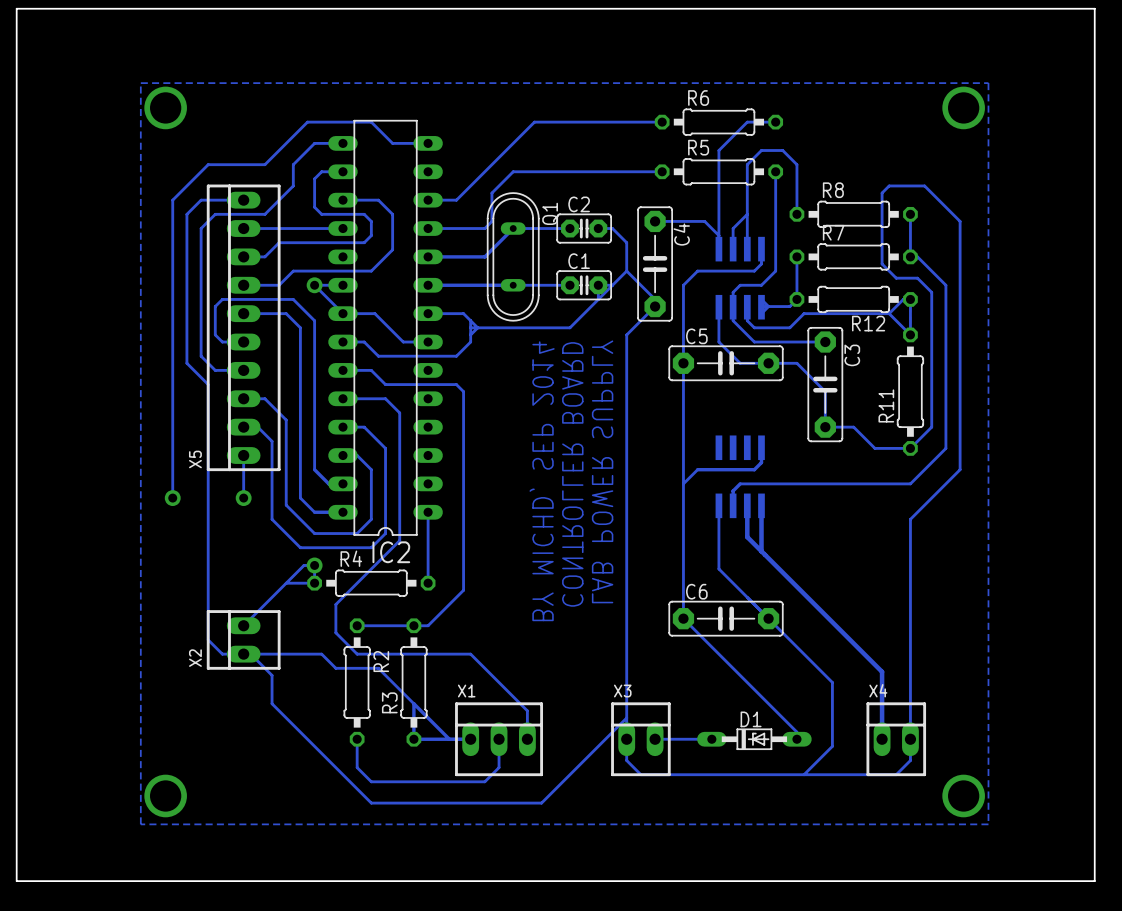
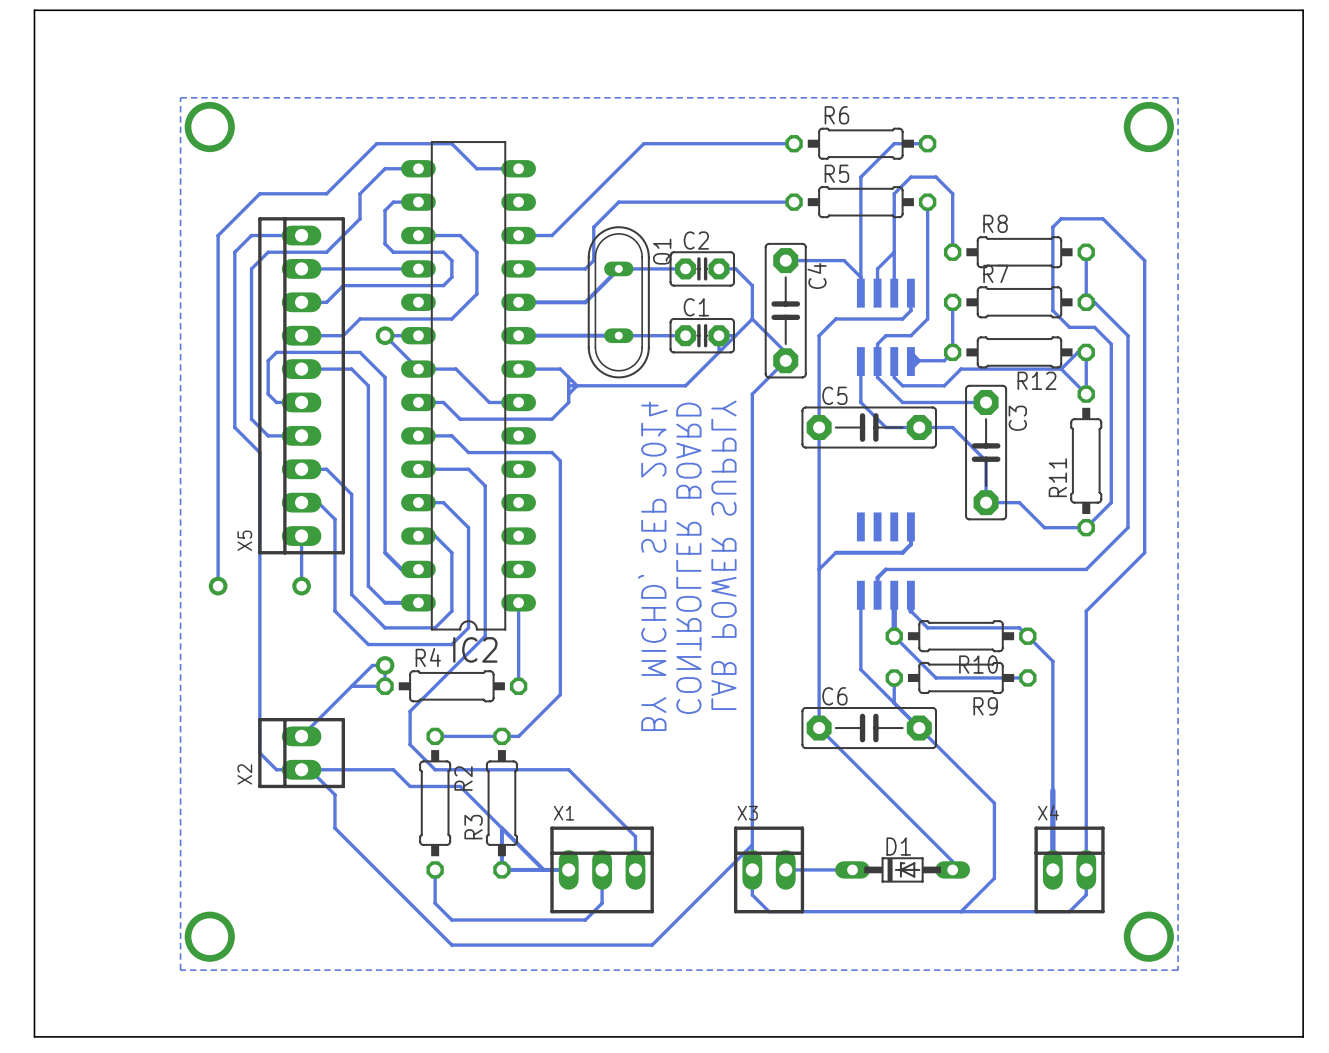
bottom track: (761, 519) (761, 551) -> none
bottom track: (747, 537) (882, 671) -> (910, 611) (927, 627) (1019, 627) (1052, 661) (1052, 790)
bottom track: none -> (894, 632) (894, 636) (935, 677) (1027, 677)
R10: none -> (961, 636)
bottom track: none -> (894, 677) (894, 702)
R9: none -> (961, 677)

